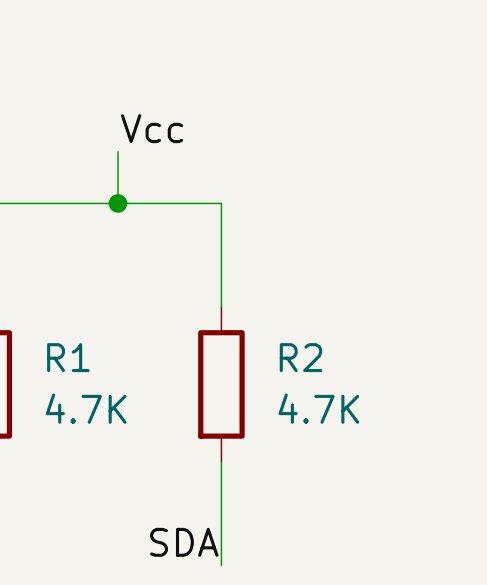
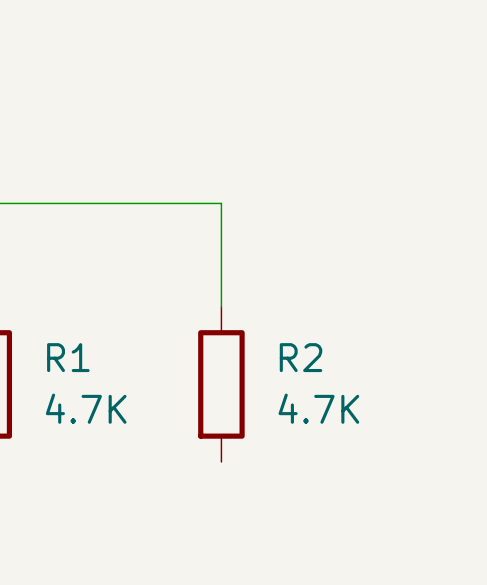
label: Vcc (152, 128) -> none
wire: (118, 151) (118, 203) -> none
junction: (118, 203) -> none
wire: (221, 461) (221, 565) -> none
label: SDA (184, 542) -> none

